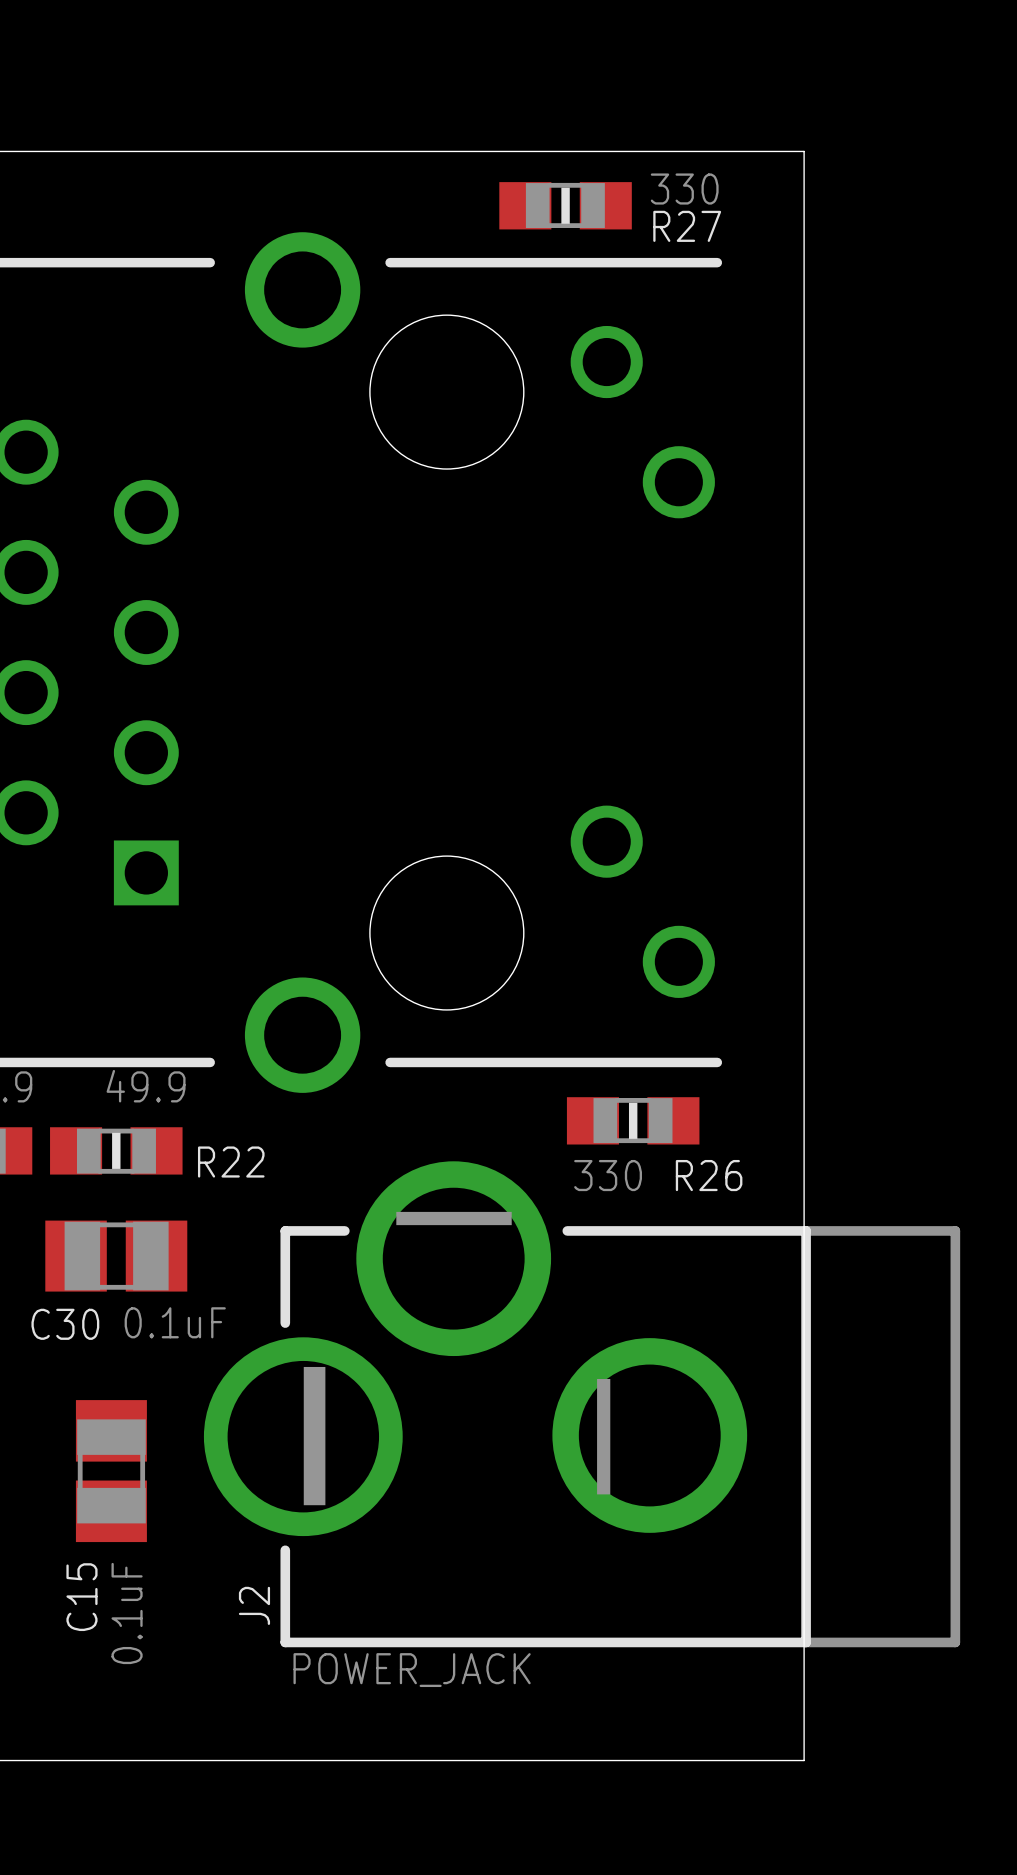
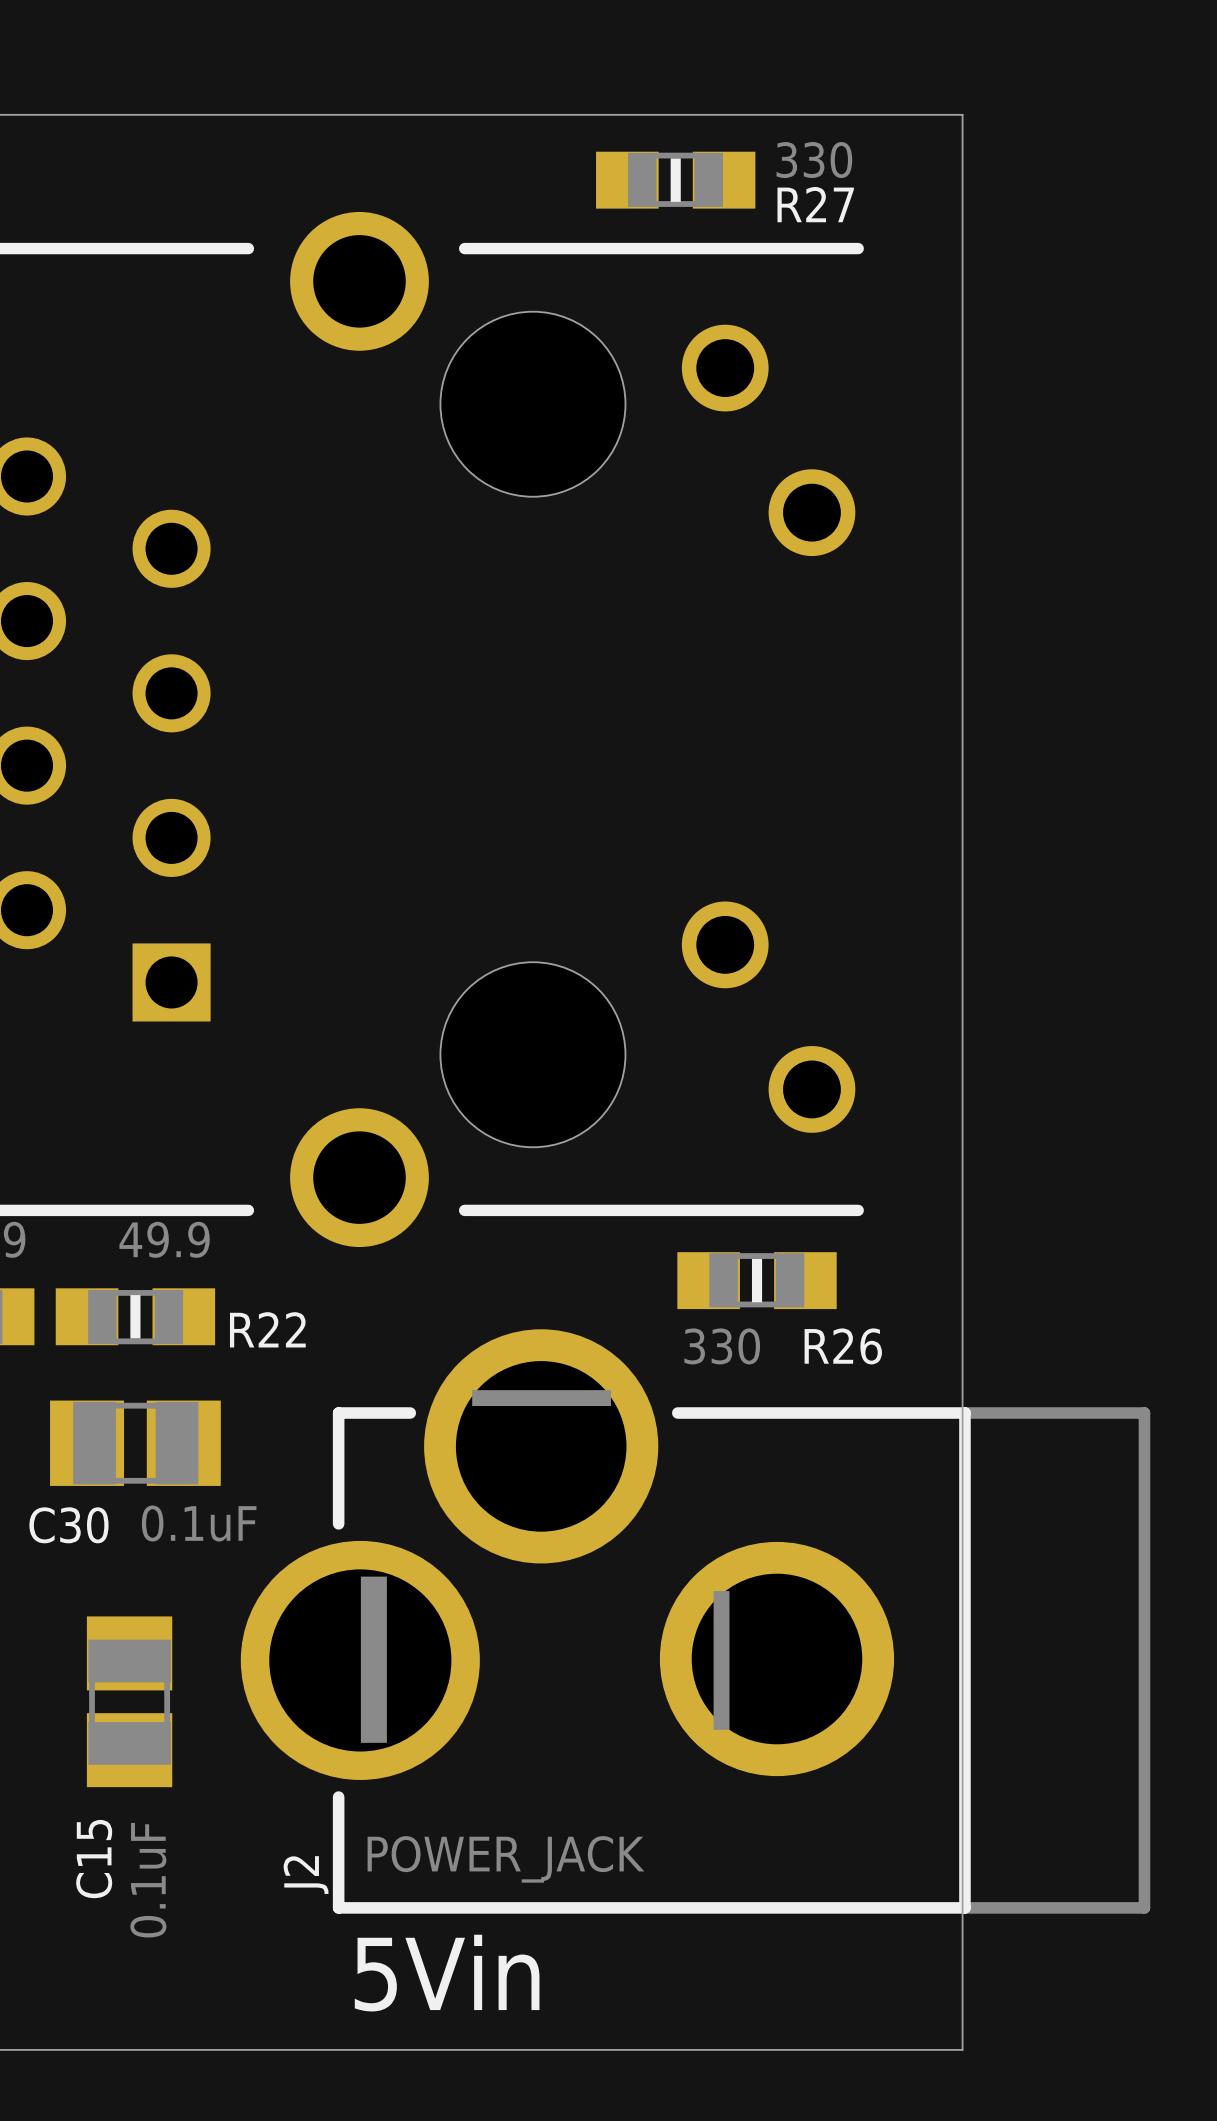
J2 value position: POWER_JACK (412, 1670) -> POWER_JACK (505, 1859)
text: none -> 5Vin (447, 1973)

